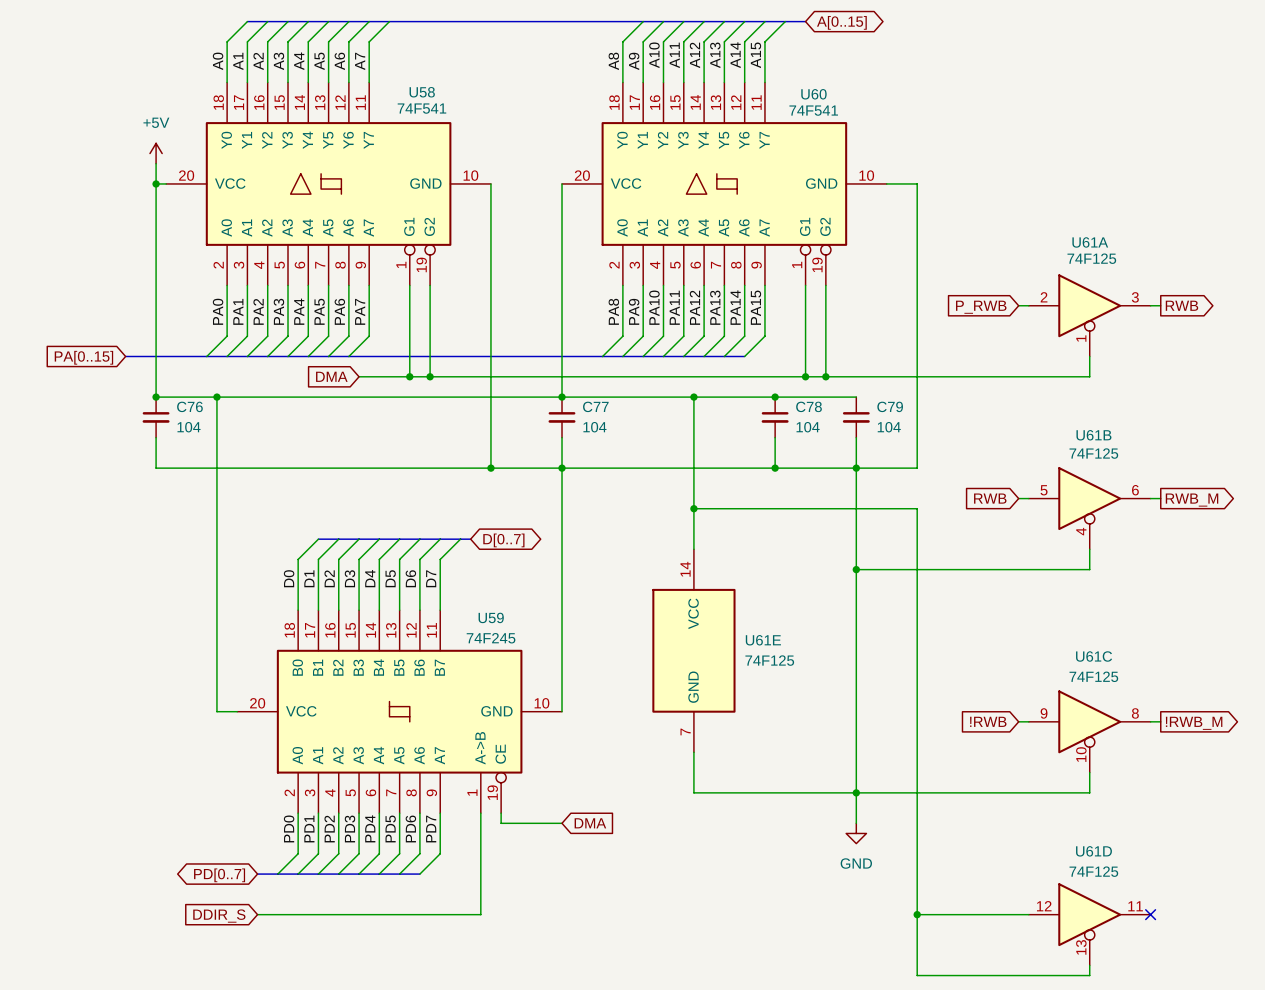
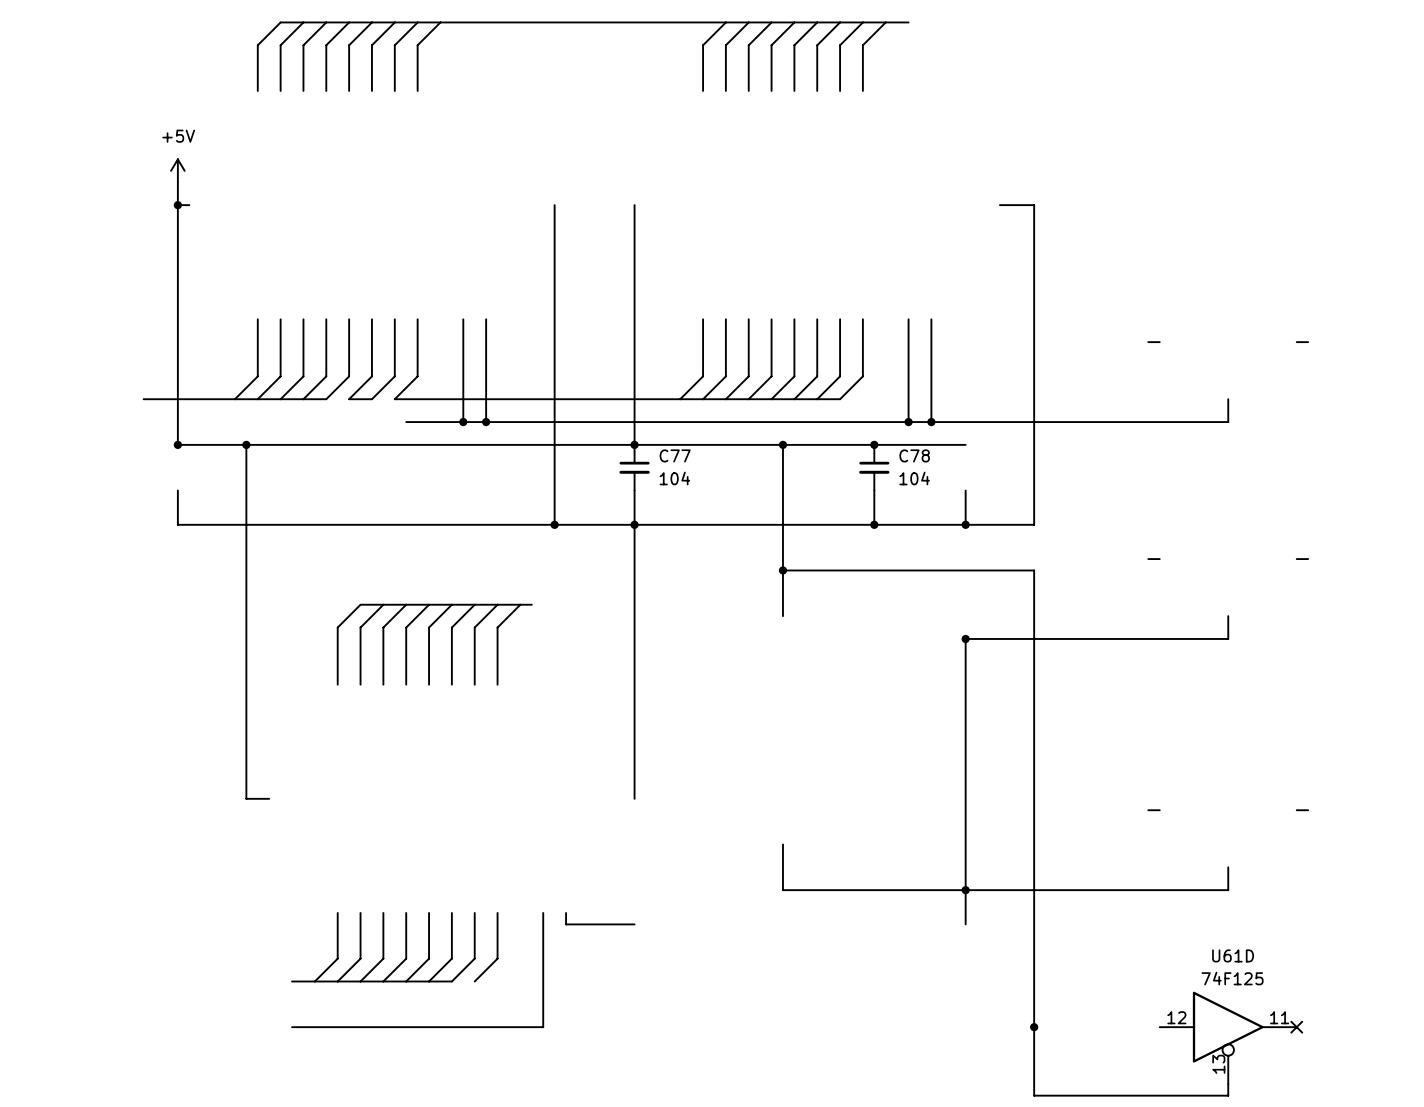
global label: A[0..15] (841, 22) -> none
label: A10 (654, 55) -> none
label: A11 (674, 55) -> none
label: A12 (694, 55) -> none
label: A13 (715, 55) -> none
label: A14 (735, 55) -> none
label: A15 (755, 55) -> none
label: A0 (218, 61) -> none
label: A1 (238, 61) -> none
label: A2 (258, 61) -> none
label: A3 (278, 61) -> none
label: A4 (299, 61) -> none
label: A5 (319, 61) -> none
label: A6 (339, 61) -> none
label: A7 (360, 61) -> none
label: A8 (613, 61) -> none
label: A9 (634, 61) -> none
U58: 74F541 (328, 183) -> none
U60: 74F541 (724, 183) -> none
global label: RWB (1181, 305) -> none
label: PA10 (654, 307) -> none
label: PA11 (674, 307) -> none
label: PA12 (694, 307) -> none
label: PA13 (715, 307) -> none
label: PA14 (735, 307) -> none
label: PA15 (755, 307) -> none
global label: P_RWB (981, 307) -> none
label: PA0 (218, 311) -> none
label: PA1 (238, 311) -> none
label: PA2 (258, 311) -> none
label: PA3 (278, 311) -> none
label: PA4 (299, 311) -> none
label: PA5 (319, 311) -> none
label: PA6 (339, 311) -> none
label: PA7 (360, 311) -> none
label: PA8 (613, 311) -> none
label: PA9 (634, 311) -> none
U61A: 74F125 (1089, 315) -> none
bus: (288, 356) (308, 356) -> none
bus: (328, 356) (348, 356) -> none
global label: PA[0..15] (83, 357) -> none
global label: DMA (331, 376) -> none
C76: 104 (156, 417) -> none
C79: 104 (856, 417) -> none
wire: (856, 468) (856, 569) -> none
global label: RWB (990, 498) -> none
global label: RWB_M (1192, 500) -> none
U61B: 74F125 (1089, 508) -> none
global label: D[0..7] (503, 540) -> none
label: D0 (289, 578) -> none
label: D1 (309, 578) -> none
label: D2 (329, 578) -> none
label: D3 (349, 578) -> none
label: D4 (370, 578) -> none
label: D5 (390, 578) -> none
label: D6 (410, 578) -> none
label: D7 (431, 578) -> none
U61E: 74F125 (693, 650) -> none
U59: 74F245 (399, 711) -> none
global label: !RWB (988, 721) -> none
global label: !RWB_M (1194, 723) -> none
U61C: 74F125 (1089, 731) -> none
global label: DMA (590, 823) -> none
label: PD0 (289, 828) -> none
label: PD3 (349, 828) -> none
label: PD4 (370, 828) -> none
label: PD5 (390, 828) -> none
label: PD6 (410, 828) -> none
label: PD1 (309, 829) -> none
label: PD2 (329, 829) -> none
label: PD7 (431, 829) -> none
power symbol: GND (856, 833) -> none
bus: (399, 874) (419, 874) -> none
global label: PD[0..7] (219, 875) -> none
wire: (917, 914) (1028, 914) -> none
global label: DDIR_S (219, 916) -> none

